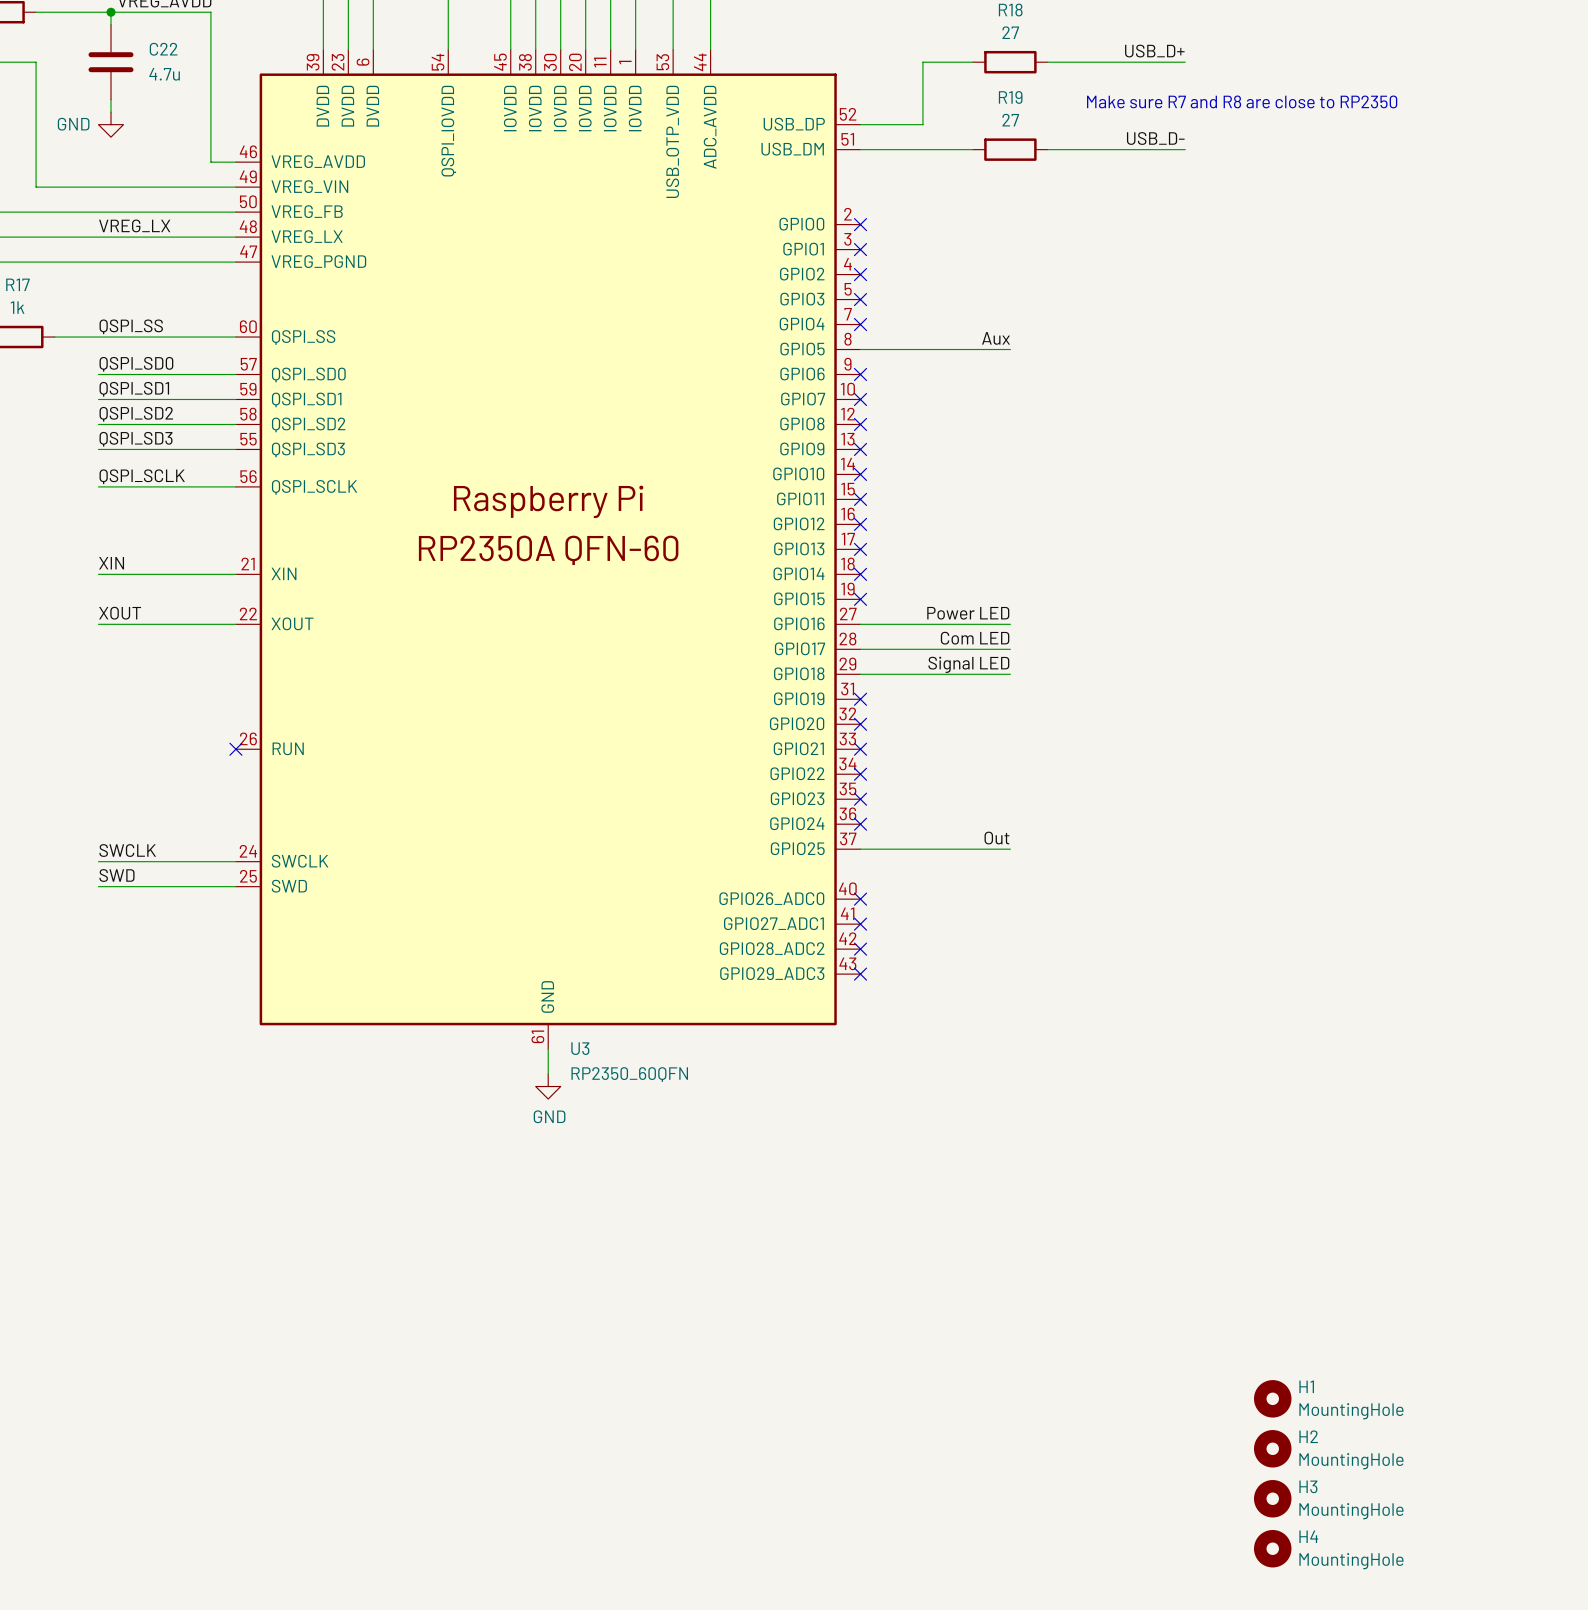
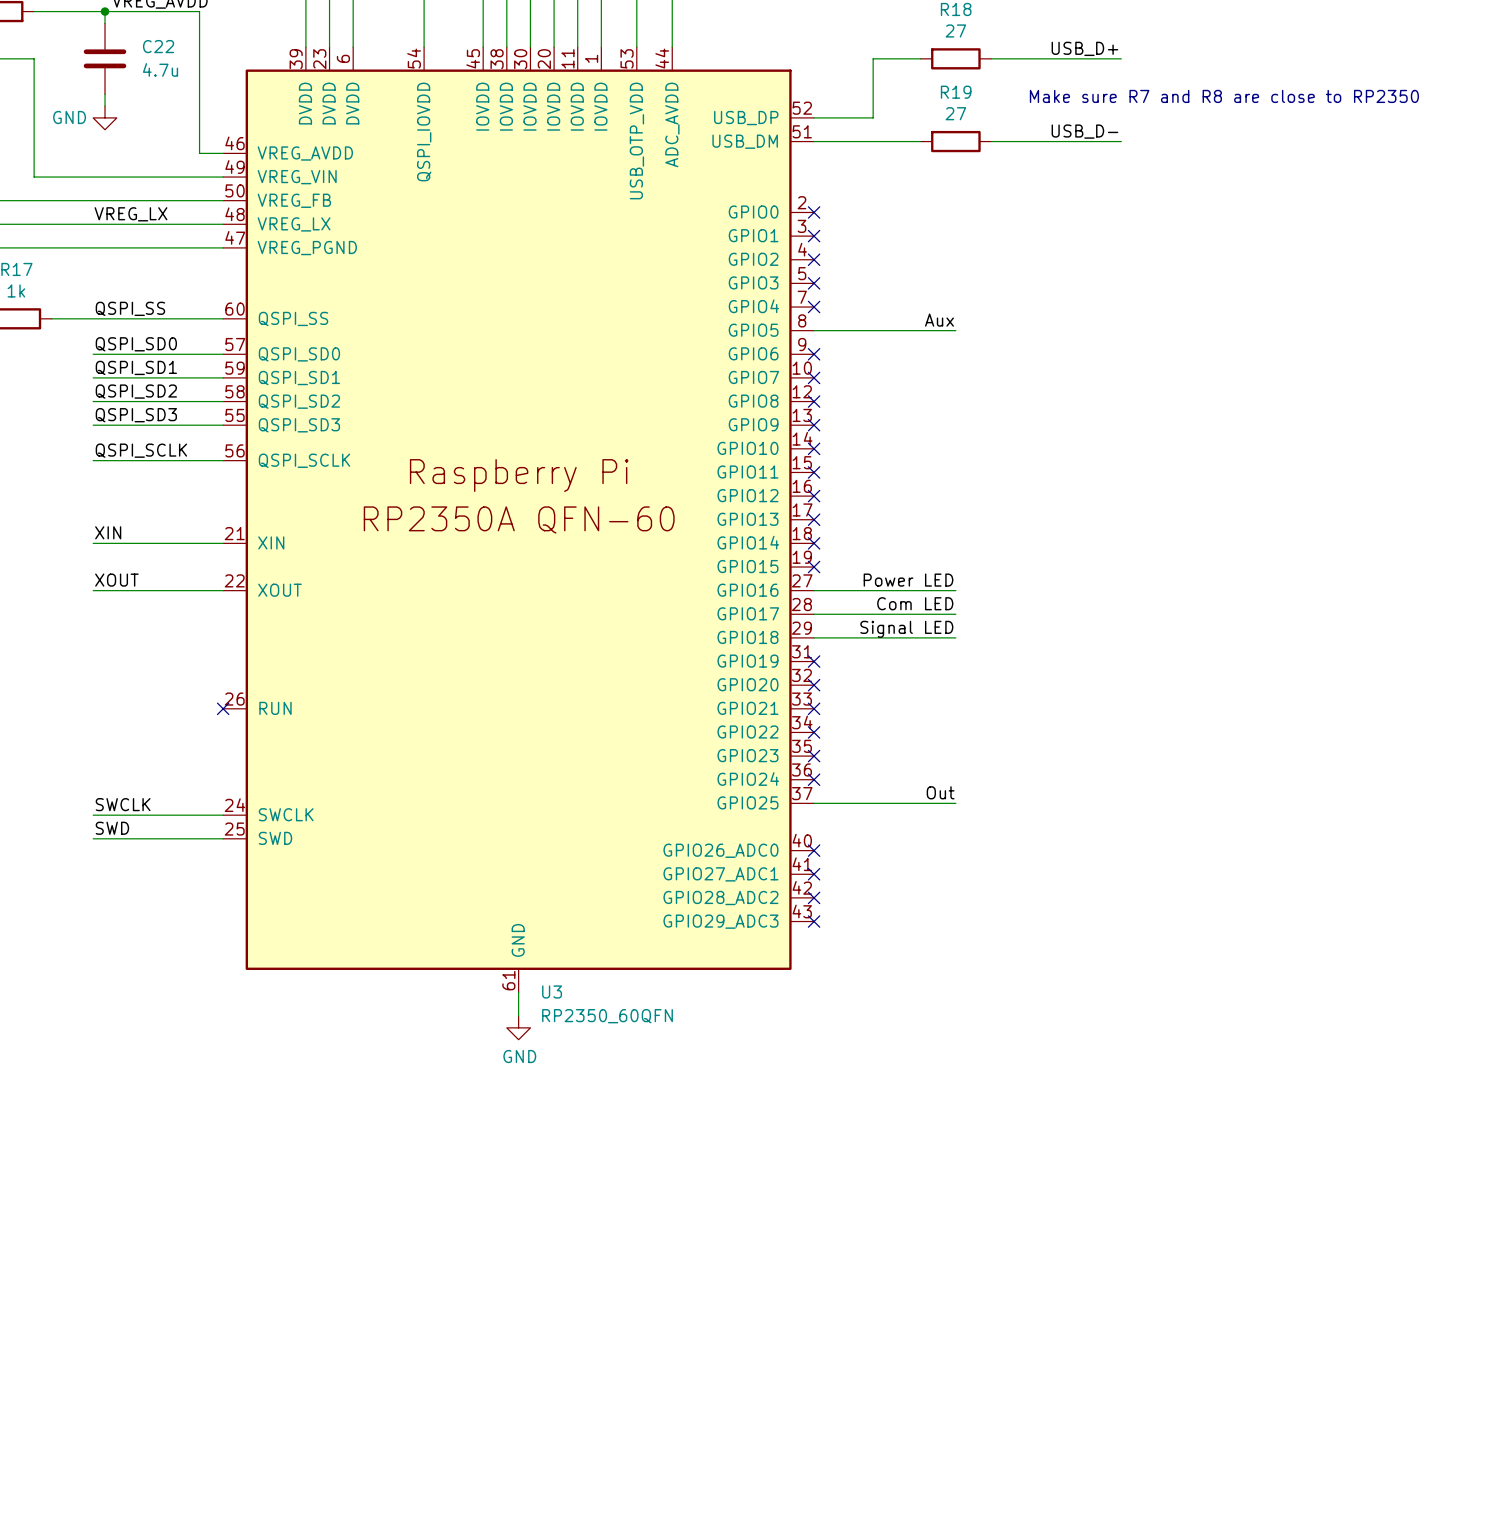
H1: MountingHole (1272, 1398) -> none
H2: MountingHole (1272, 1448) -> none
H3: MountingHole (1272, 1498) -> none
H4: MountingHole (1272, 1548) -> none

